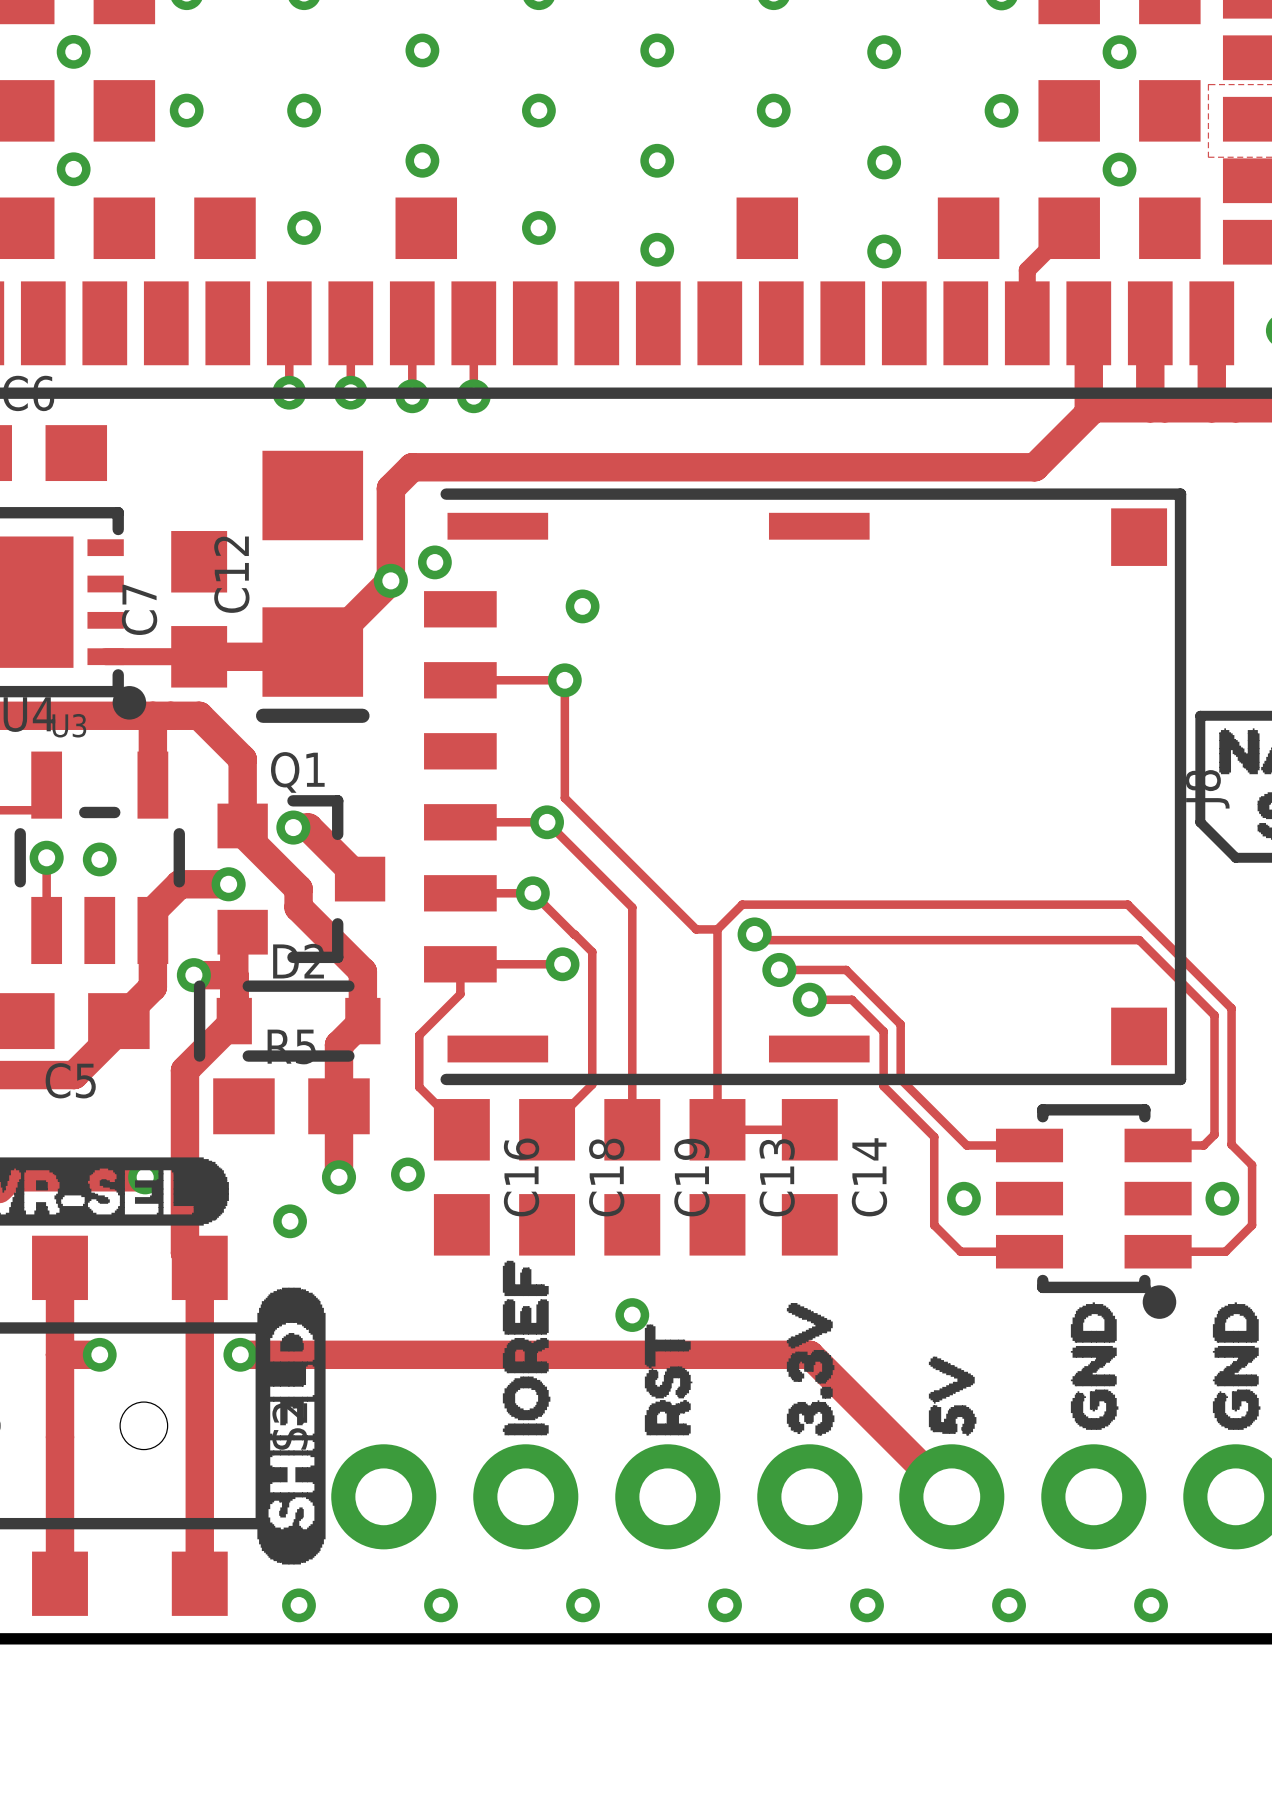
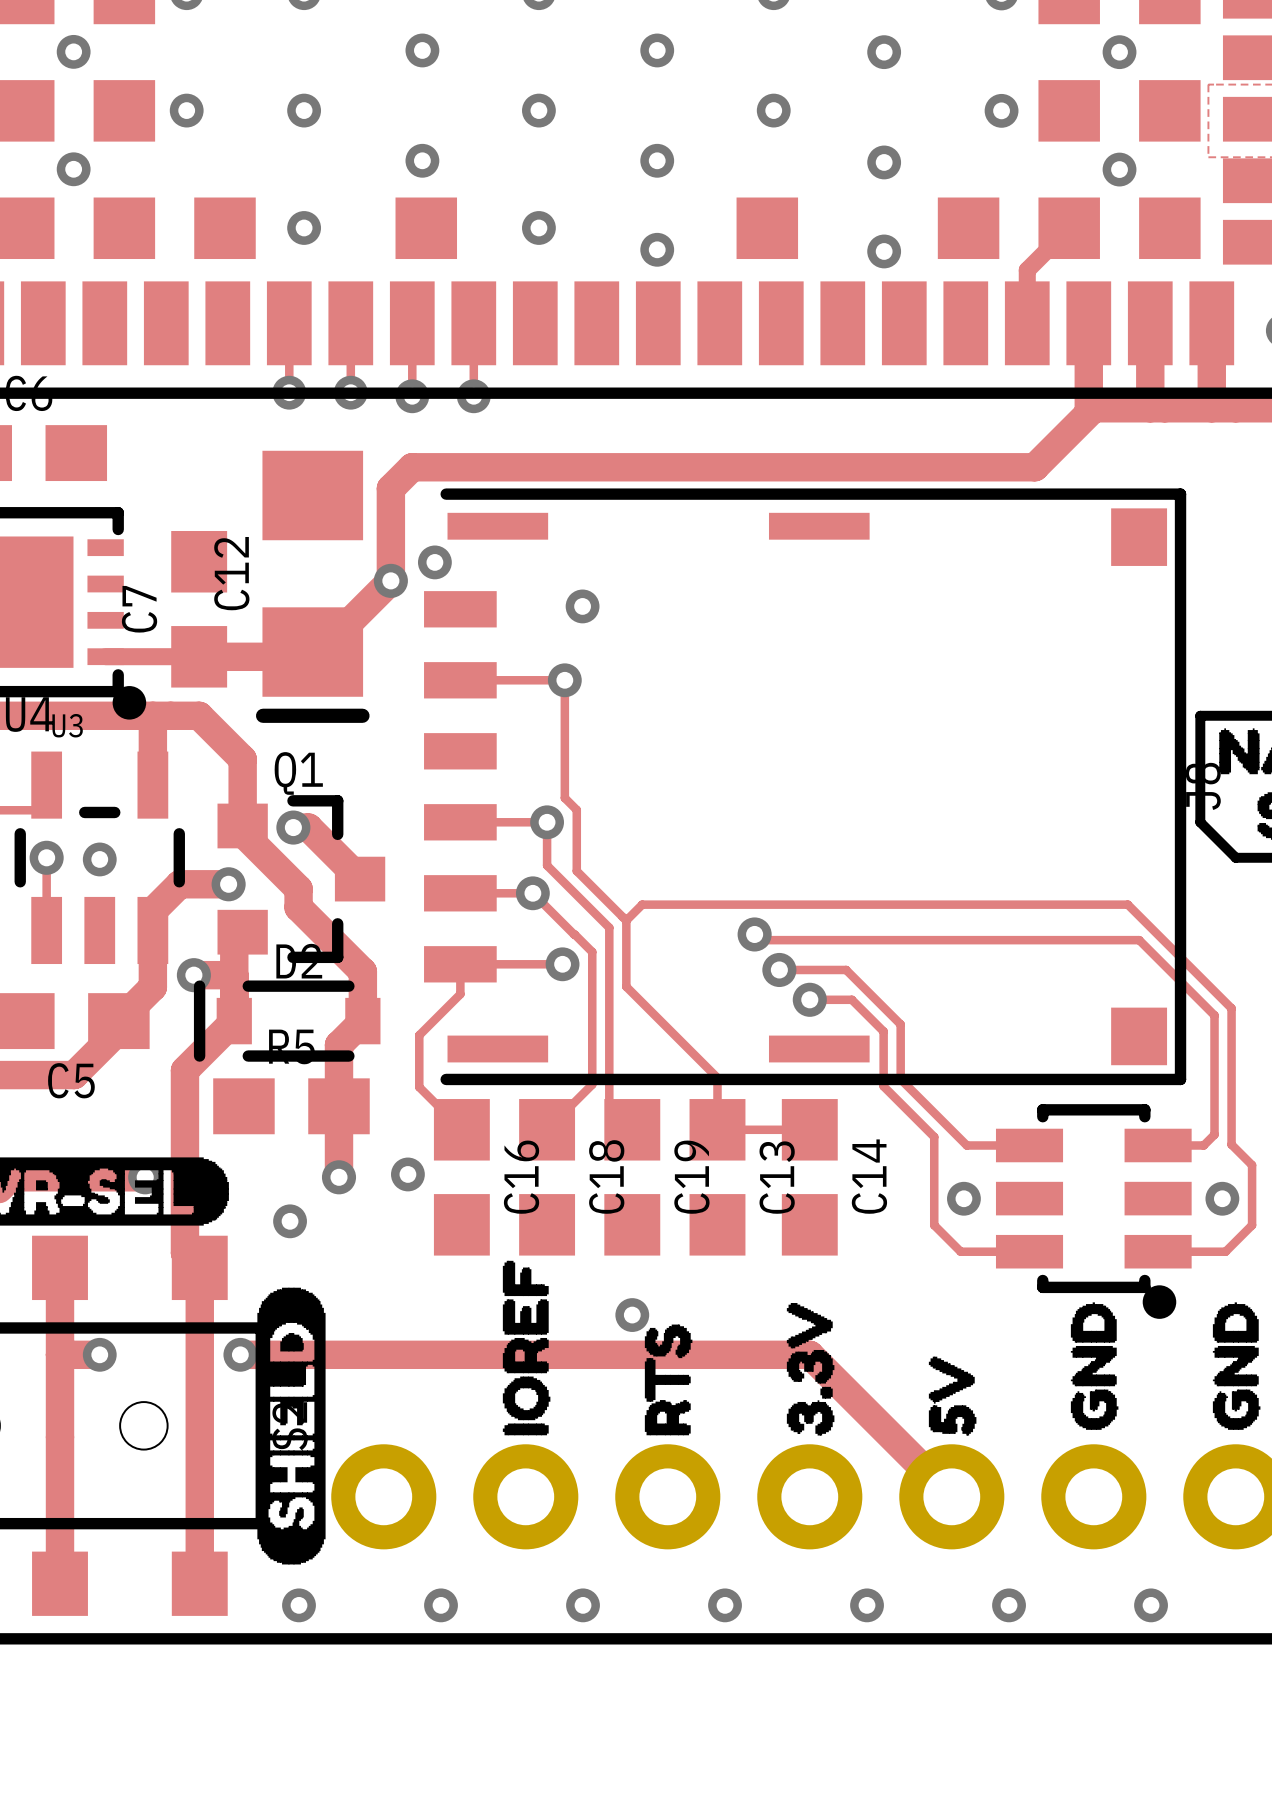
track: (576, 809) (696, 929) (717, 929) -> (576, 809) (576, 871) (626, 920)
track: (547, 822) (632, 907) (632, 1129) -> (547, 822) (547, 865) (609, 927) (609, 1106) (632, 1129)
track: (742, 904) (717, 929) -> (742, 904) (642, 904) (626, 920)
track: (717, 929) (717, 1077) -> (626, 920) (626, 986) (717, 1077)
drawing shape: [644, 1324, 693, 1436] -> [644, 1324, 693, 1436]

